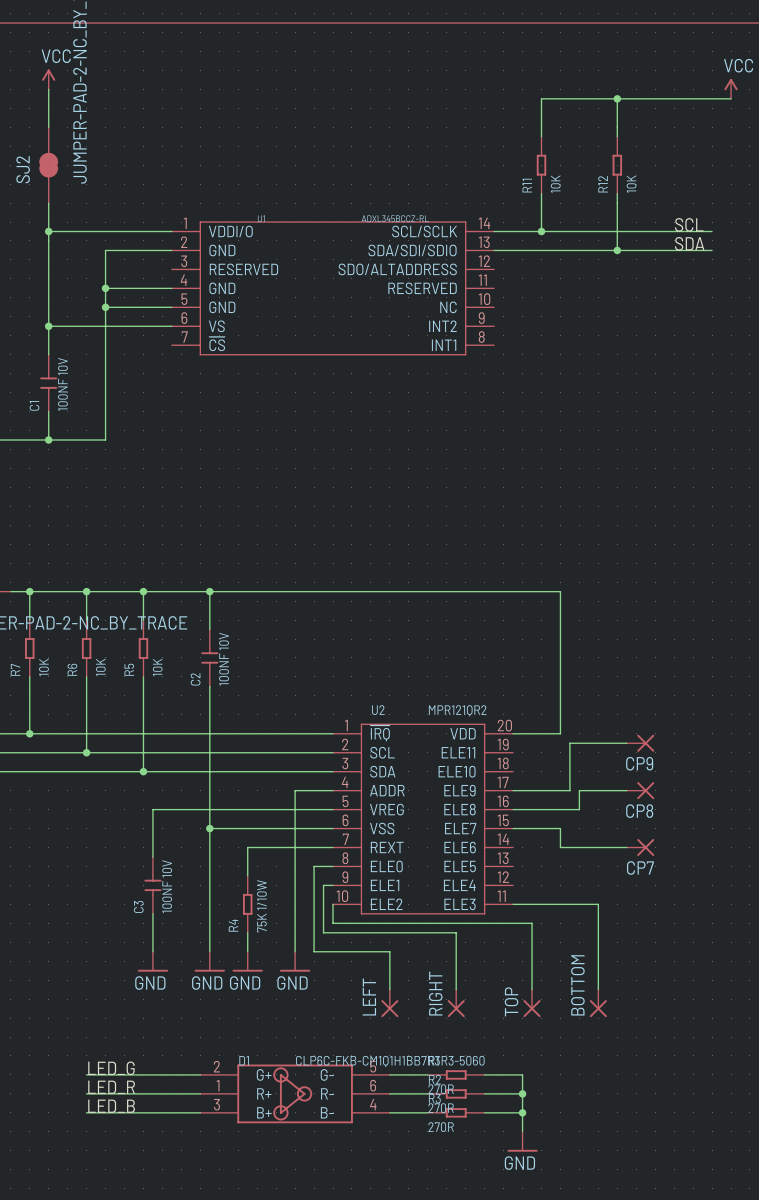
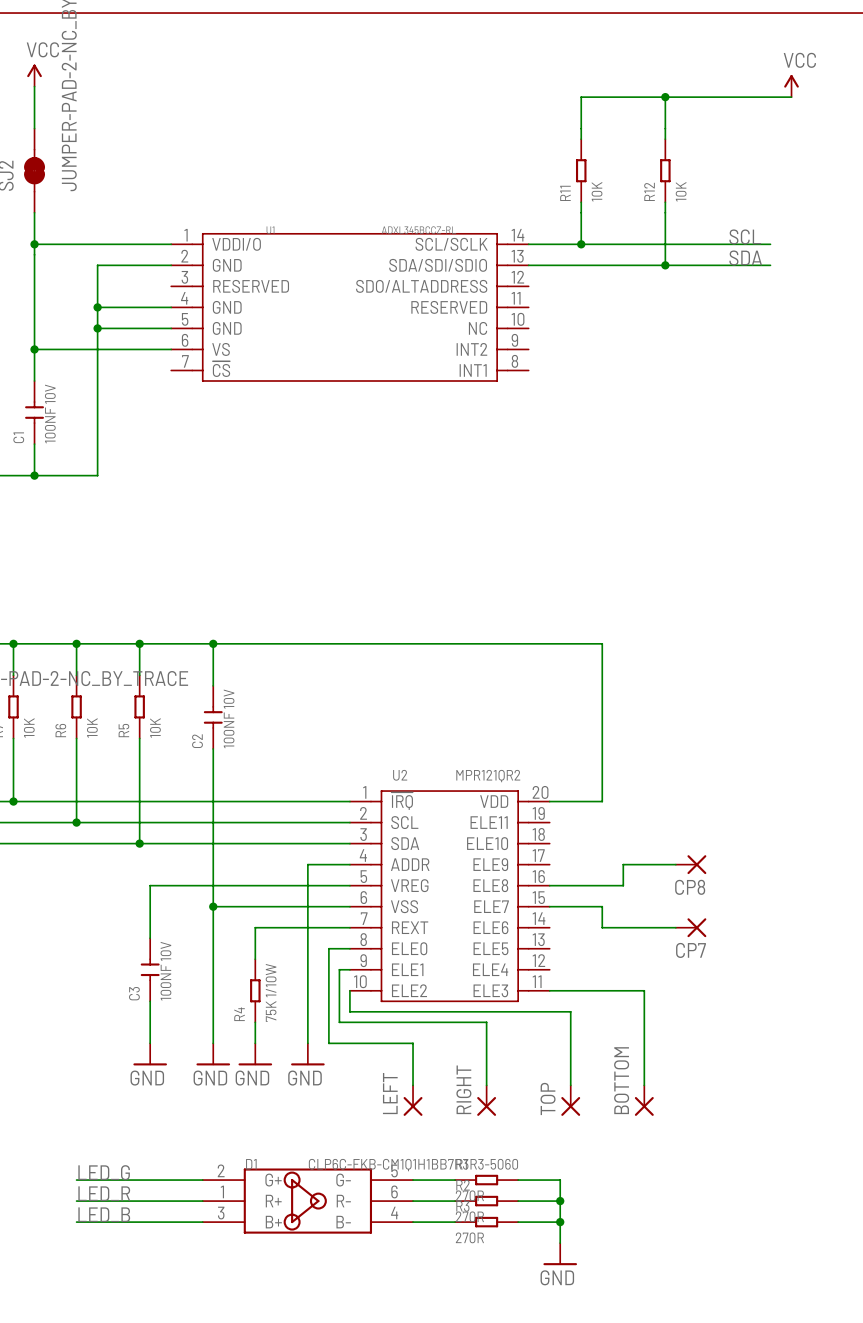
wire: (626, 743) (569, 743) (569, 790) (513, 790) -> none
CP9: (640, 743) -> none

